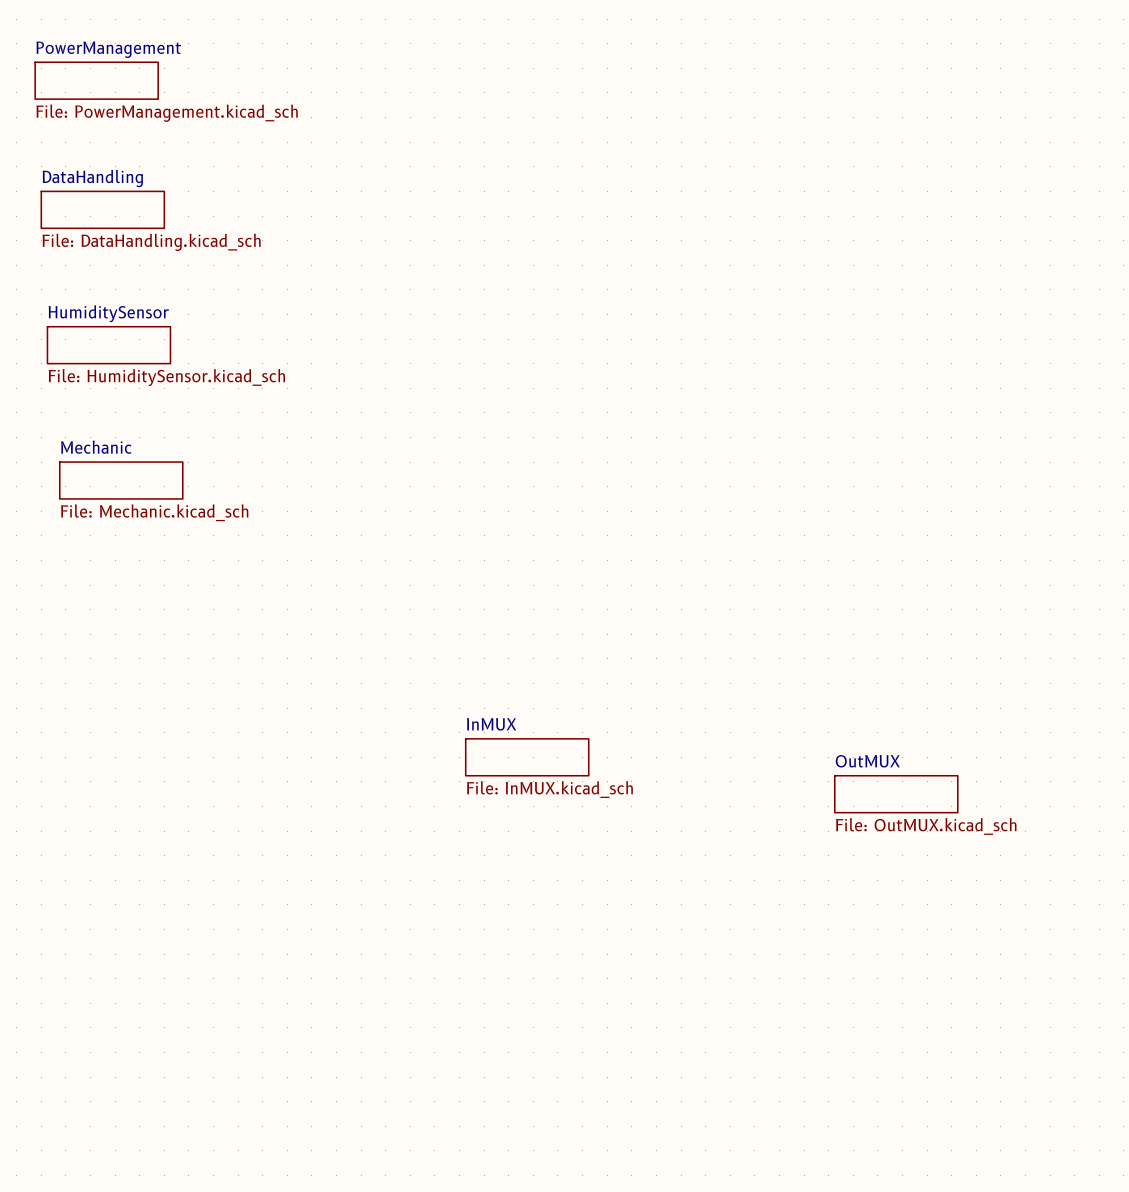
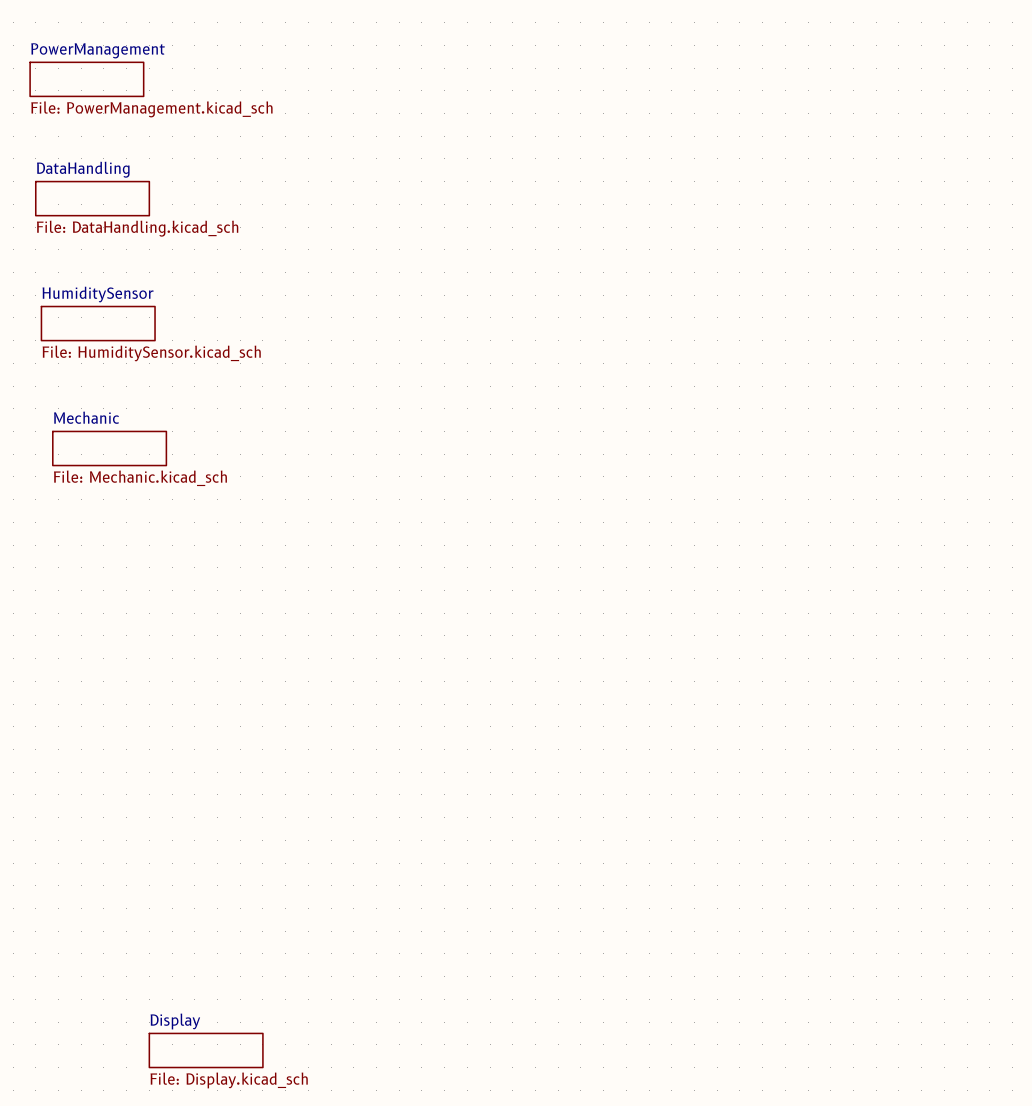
sheet InMUX: File: InMUX.kicad_sch (527, 757) -> none
sheet OutMUX: File: OutMUX.kicad_sch (896, 794) -> none
sheet Display: none -> File: Display.kicad_sch (206, 1050)

